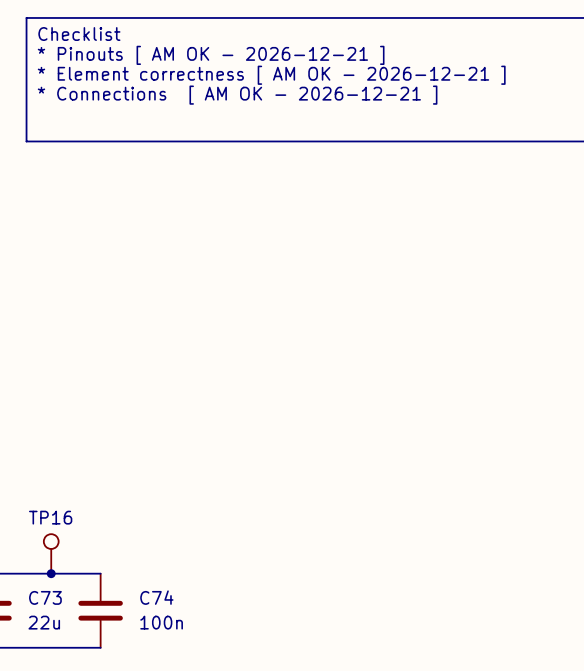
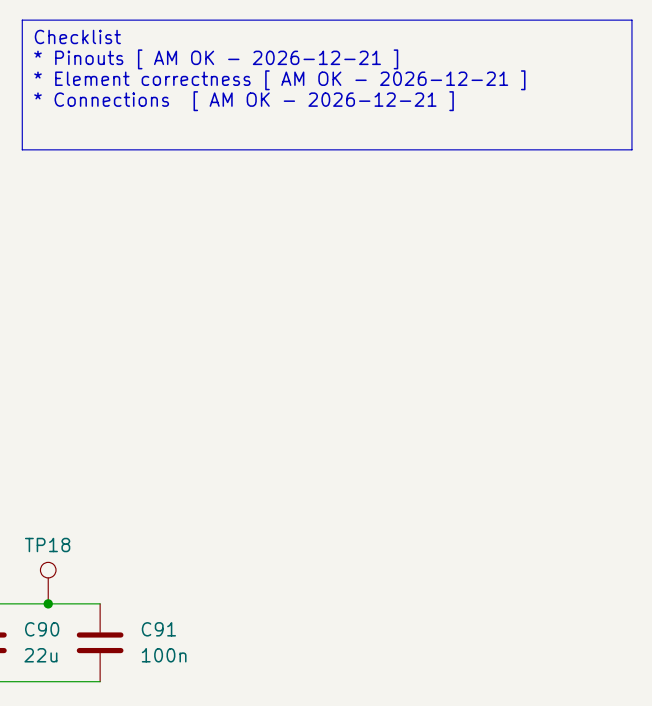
TP16 name: TP16 (50, 517) -> TP18 (47, 545)
C73 name: C73 (45, 597) -> C90 (42, 629)
C74 name: C74 (156, 597) -> C91 (158, 629)

